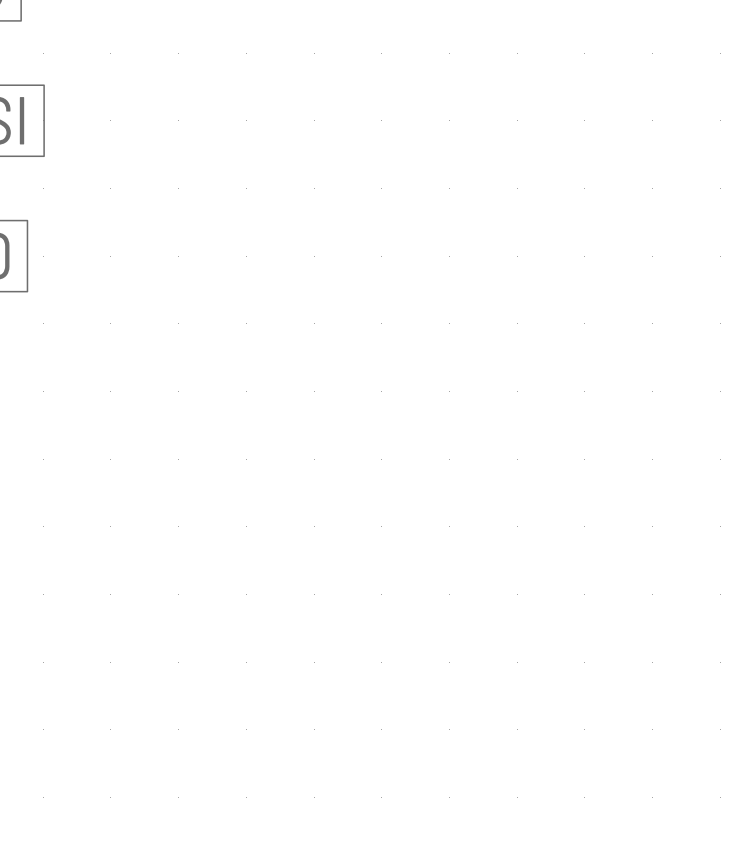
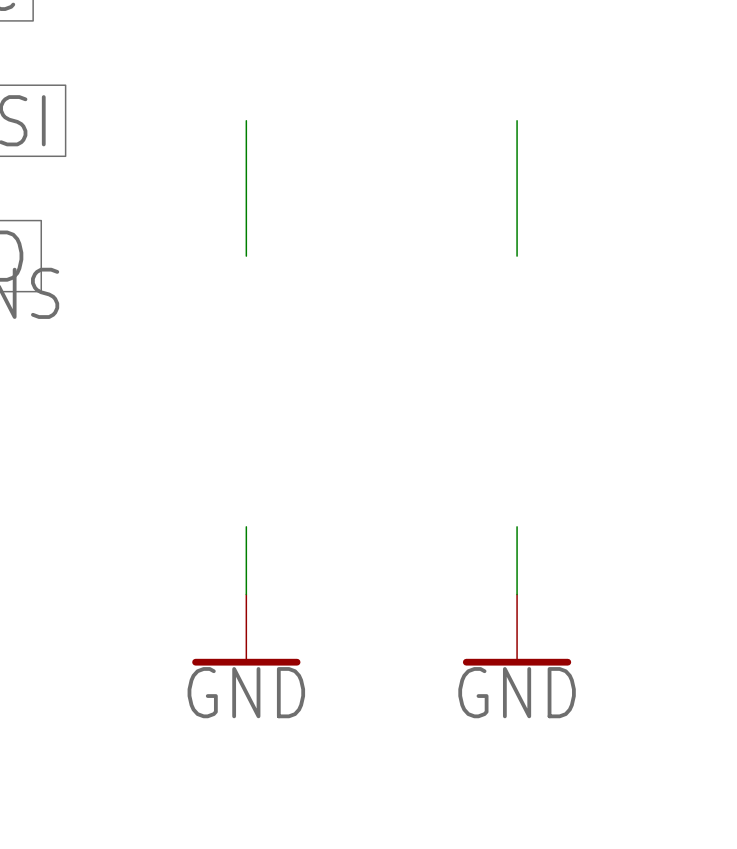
wire: none -> (246, 120) (246, 256)
wire: none -> (517, 120) (517, 256)
wire: none -> (246, 526) (246, 594)
wire: none -> (517, 526) (517, 594)
power symbol: none -> GND (246, 630)
power symbol: none -> GND (517, 630)

